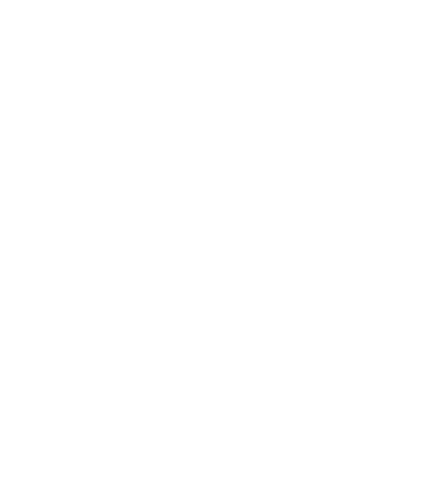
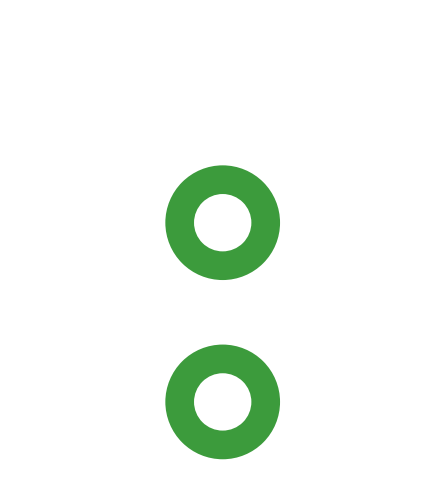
part: none -> (222, 312)

